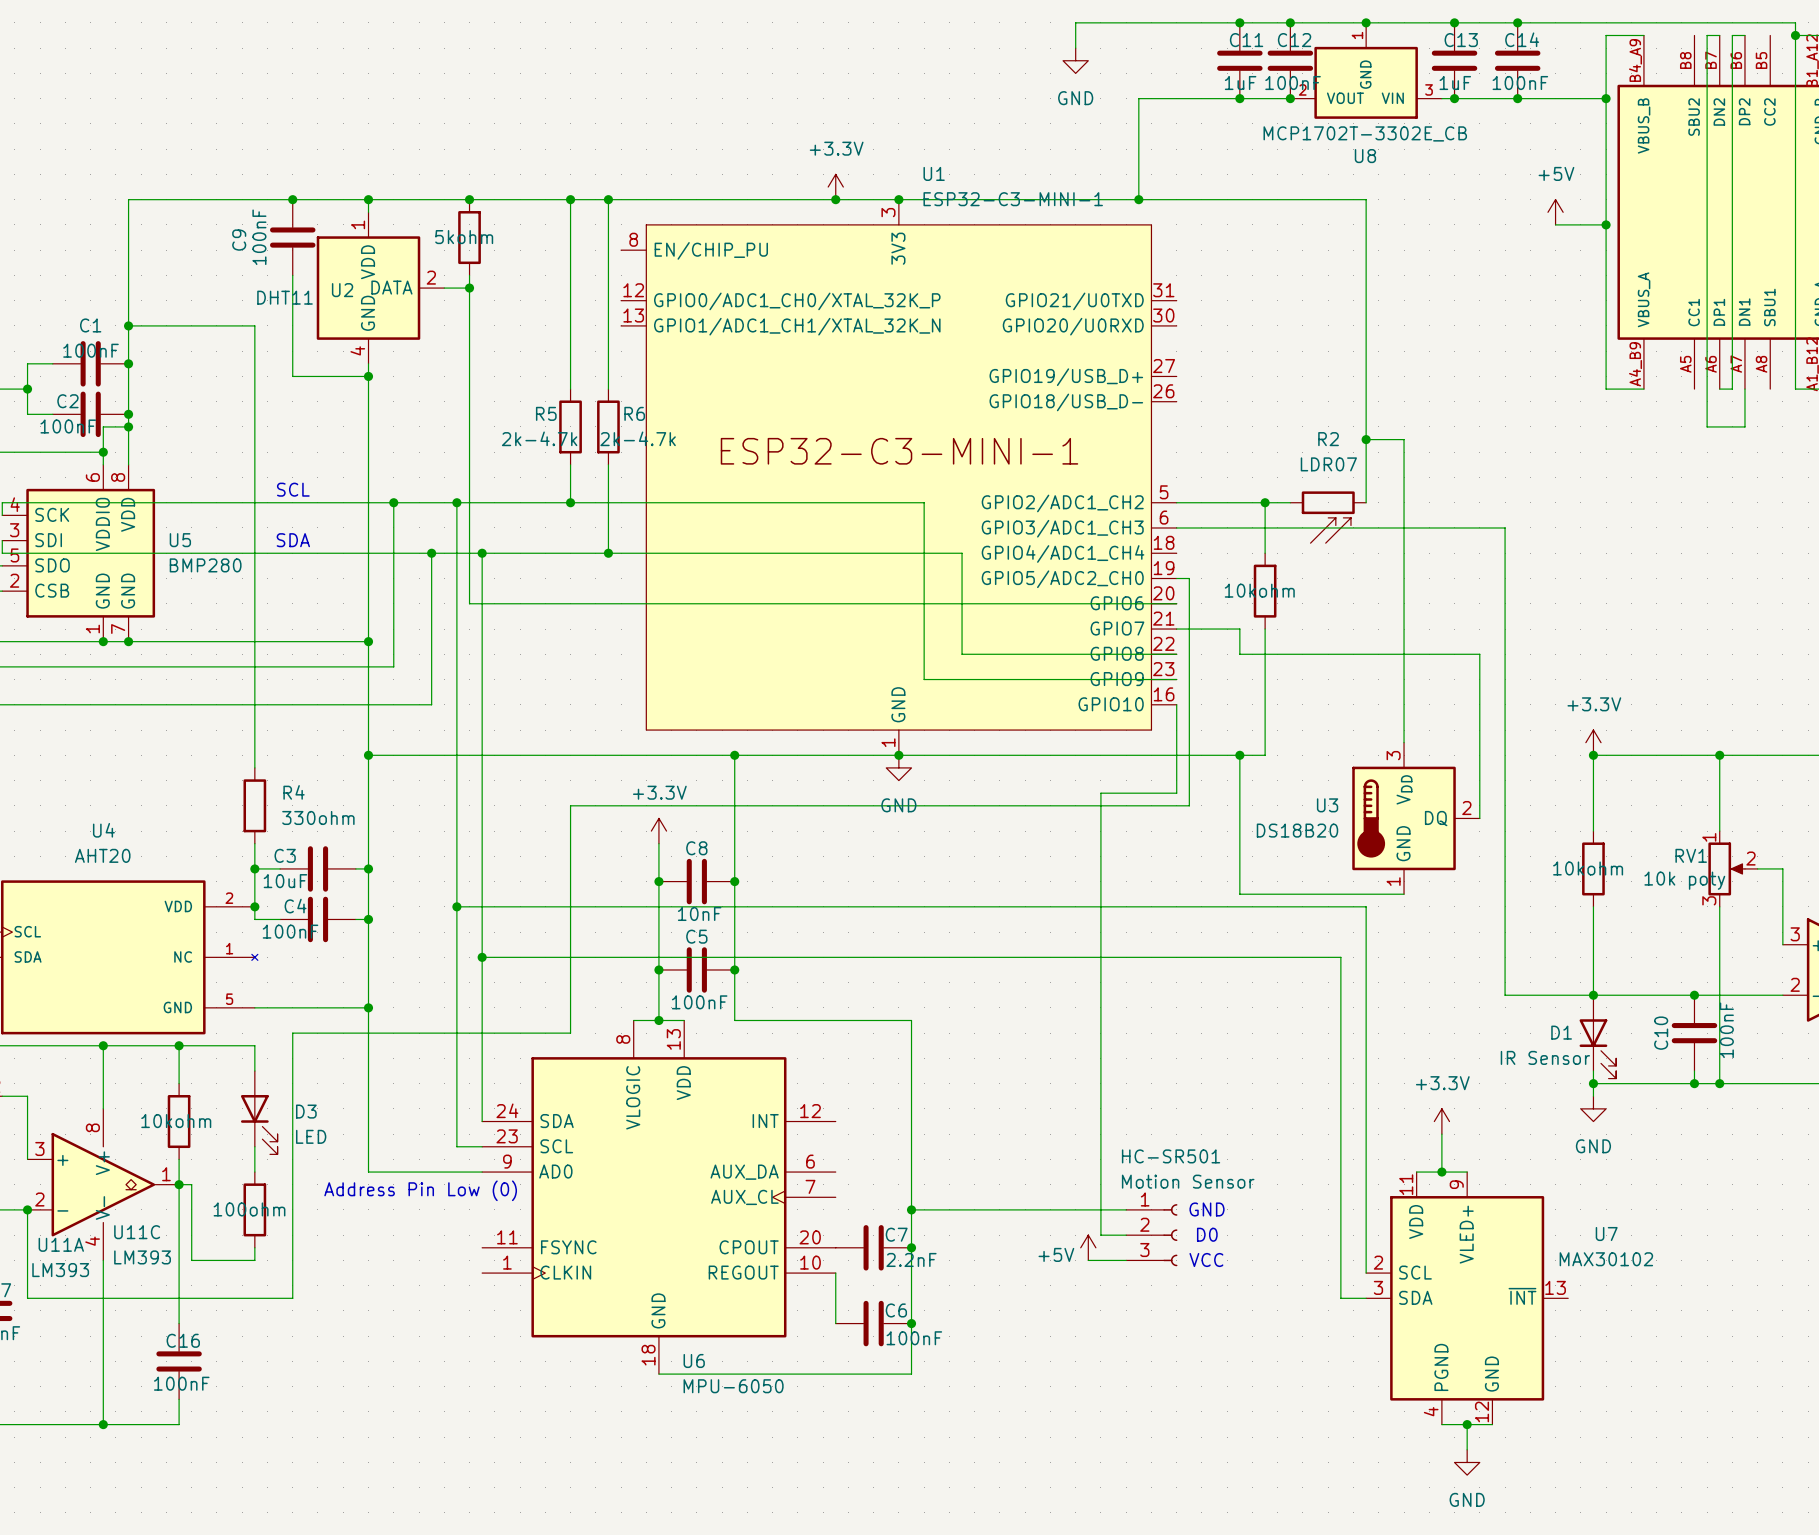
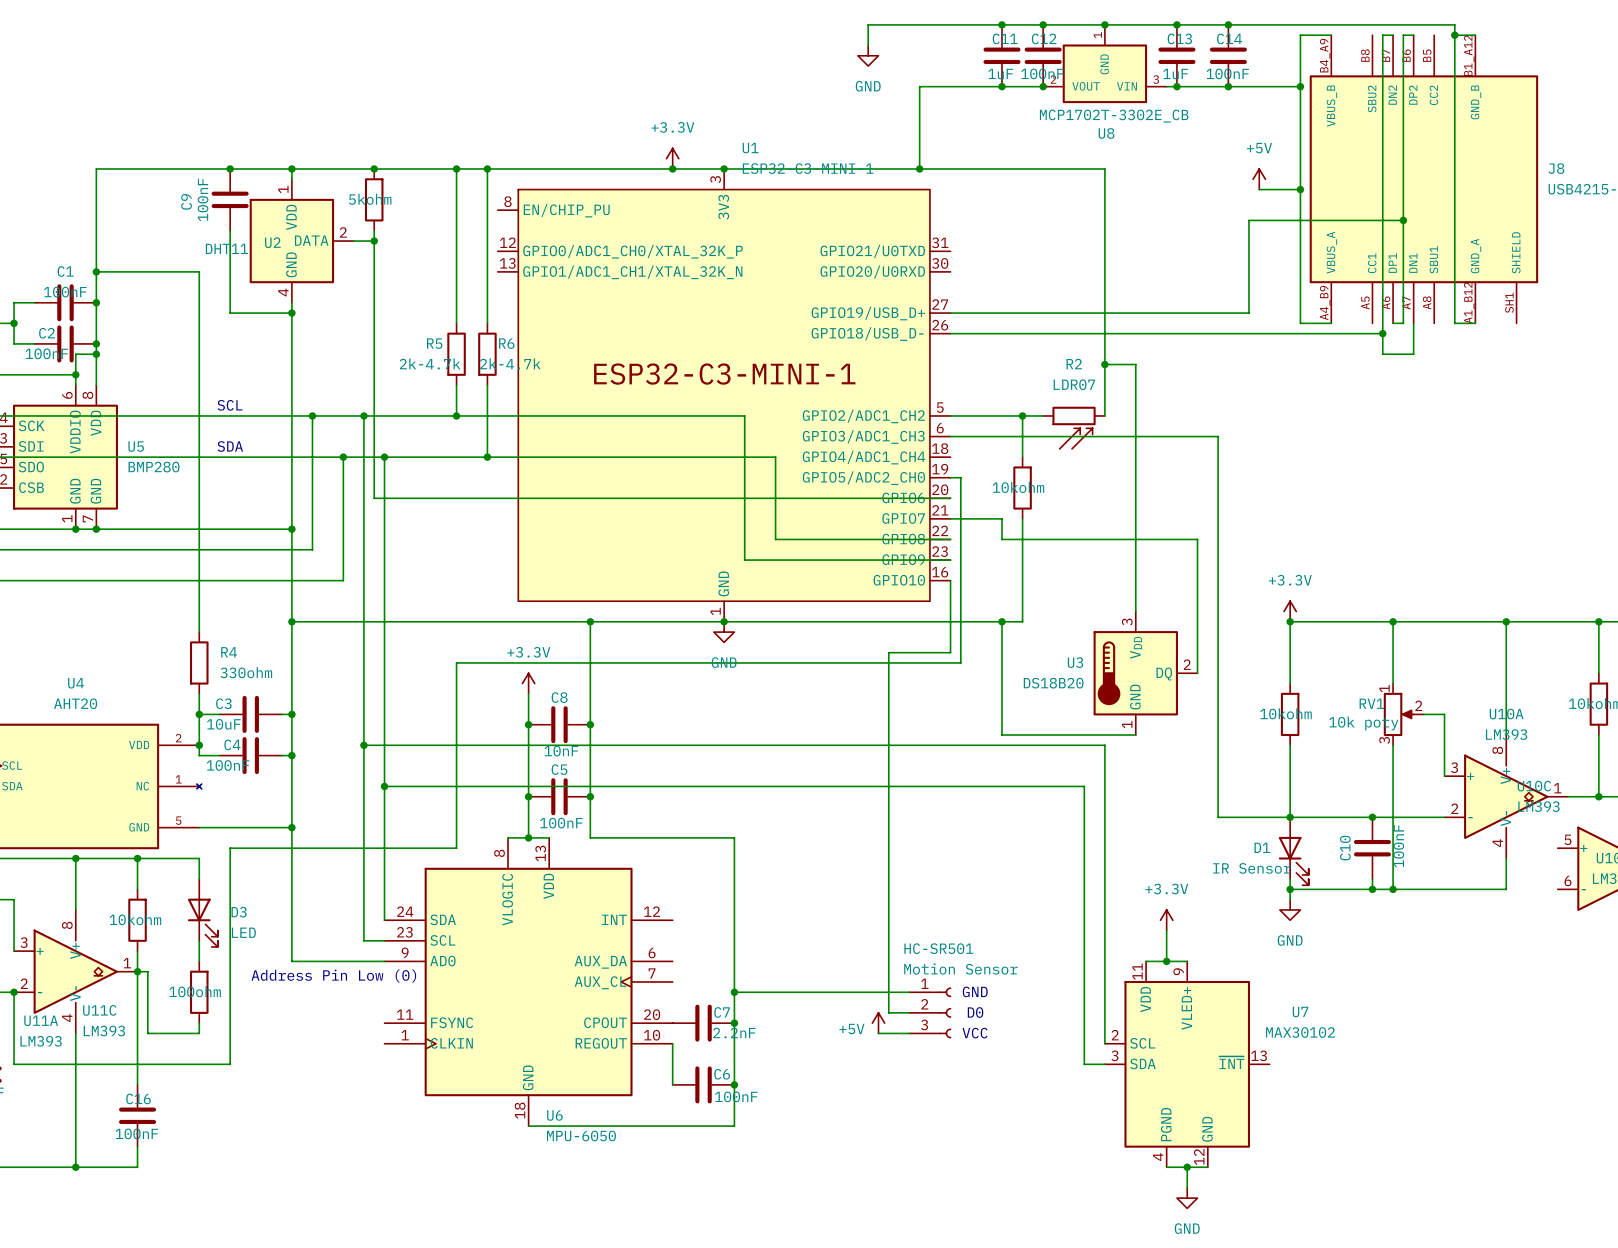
wire: none -> (1403, 220) (1248, 220) (1248, 313) (950, 313)
junction: none -> (1403, 220)
wire: none -> (950, 333) (1382, 333)
junction: none -> (1382, 333)

